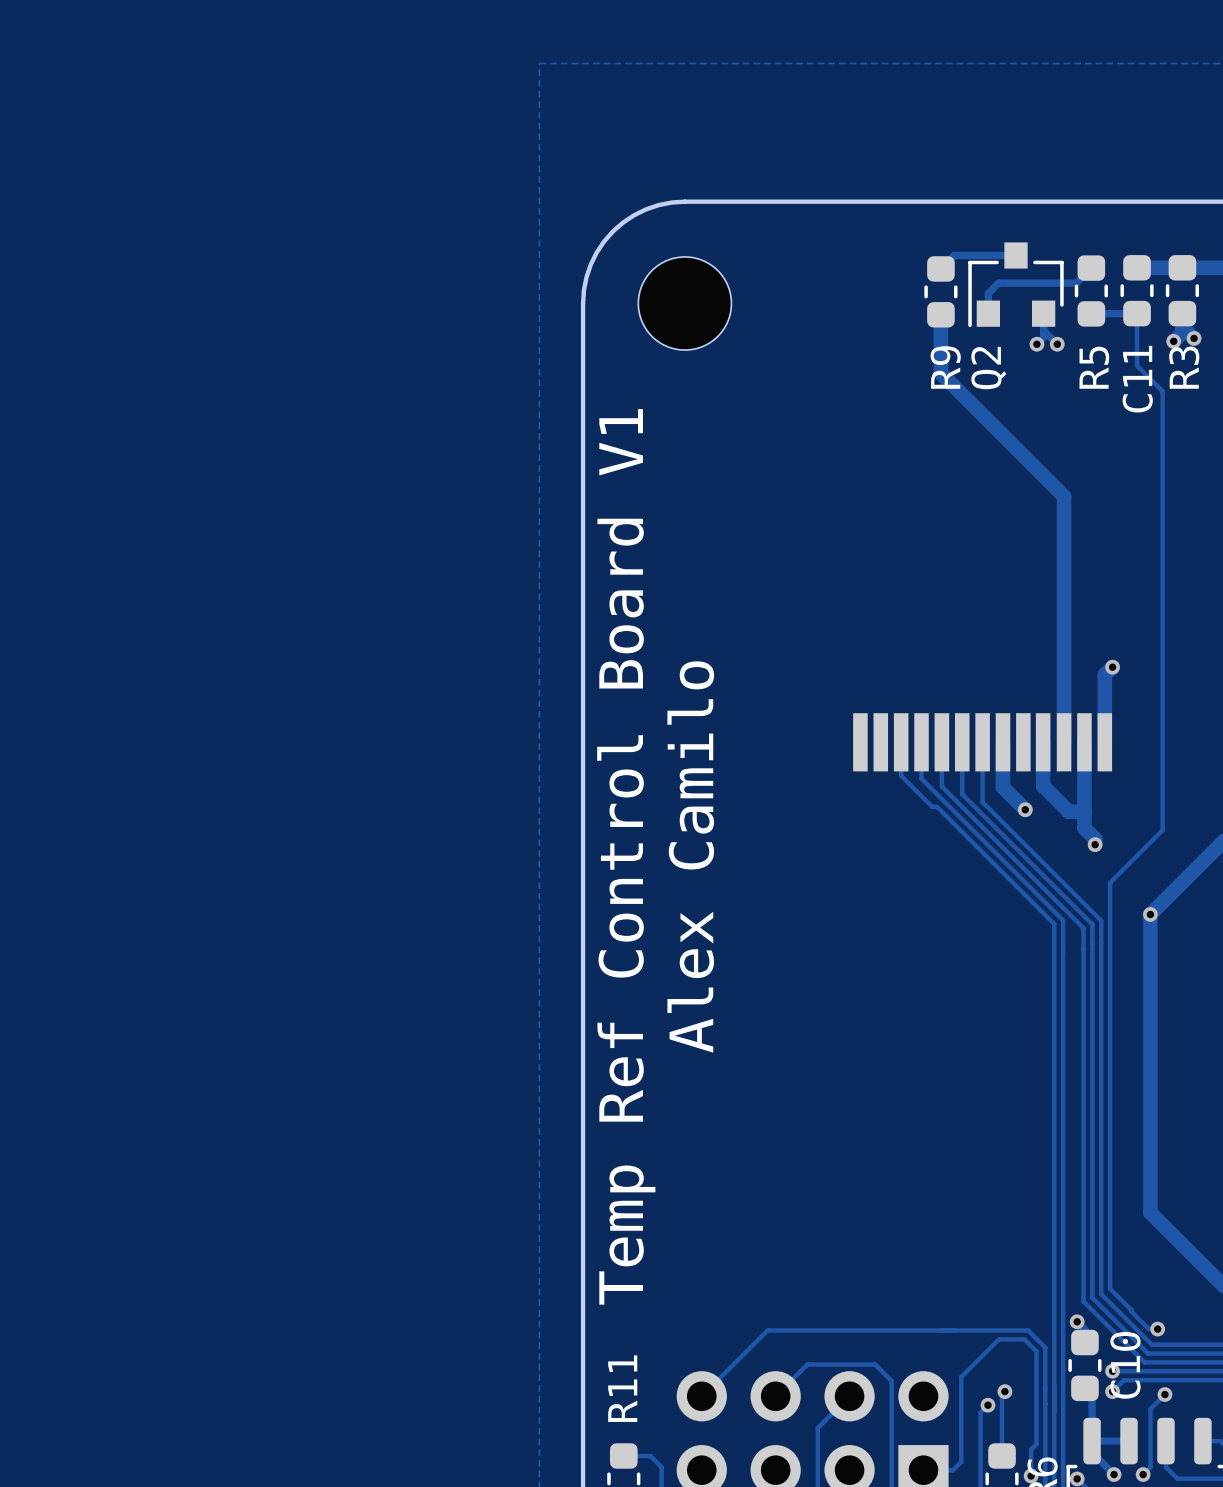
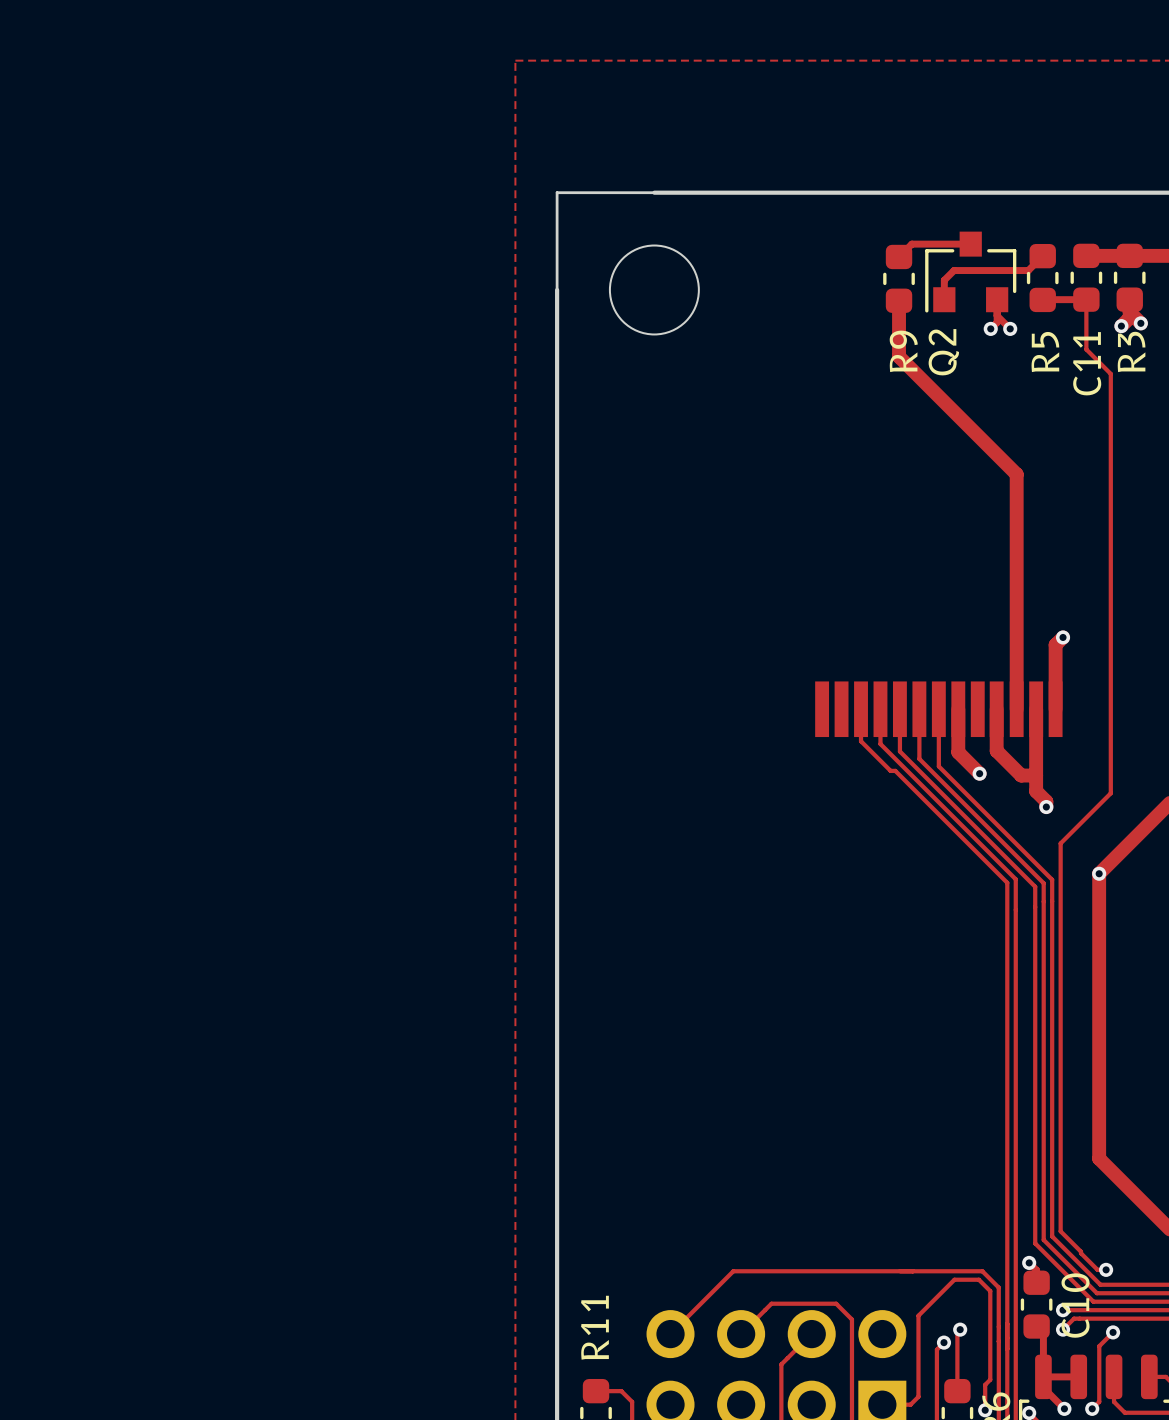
board edge: (684, 201) (671, 202) (645, 209) (622, 222) (612, 231) (604, 241) (590, 264) (586, 277) (583, 303) -> (654, 192) (557, 192) (557, 289)
text: Temp Ref Control Board V1 (626, 856) -> none
text: Alex Camilo (690, 857) -> none

